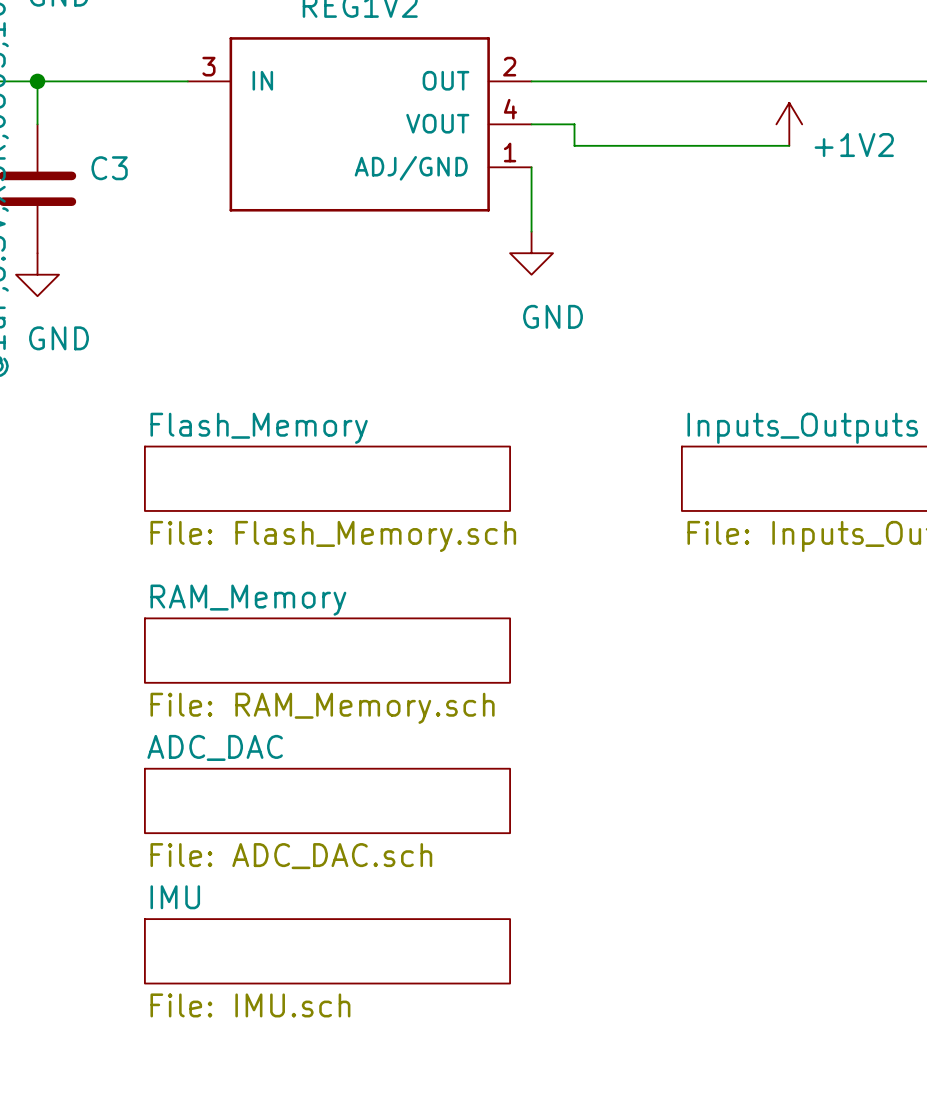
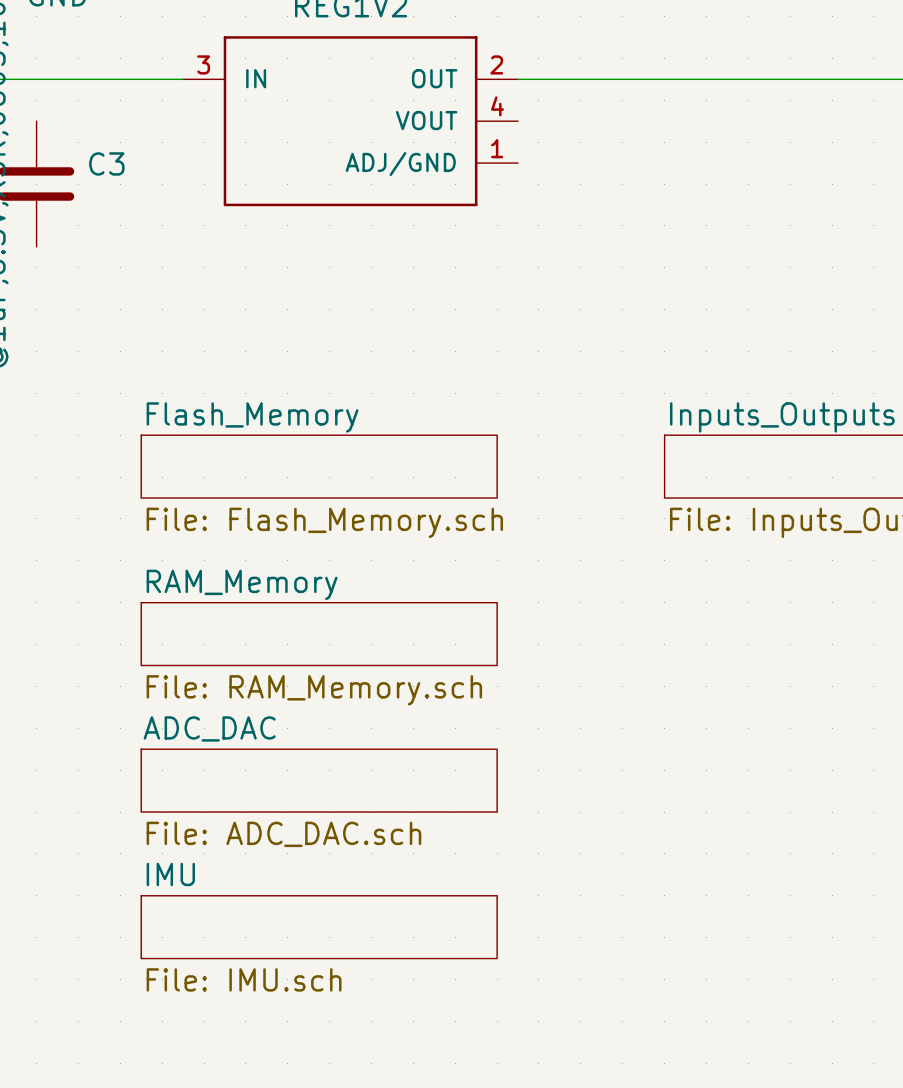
wire: (37, 81) (37, 124) -> none
junction: (37, 81) -> none
wire: (531, 124) (574, 124) (574, 145) (789, 145) -> none
power symbol: +1V2 (789, 124) -> none
wire: (531, 167) (531, 231) -> none
power symbol: GND (531, 253) -> none
power symbol: GND (37, 274) -> none

